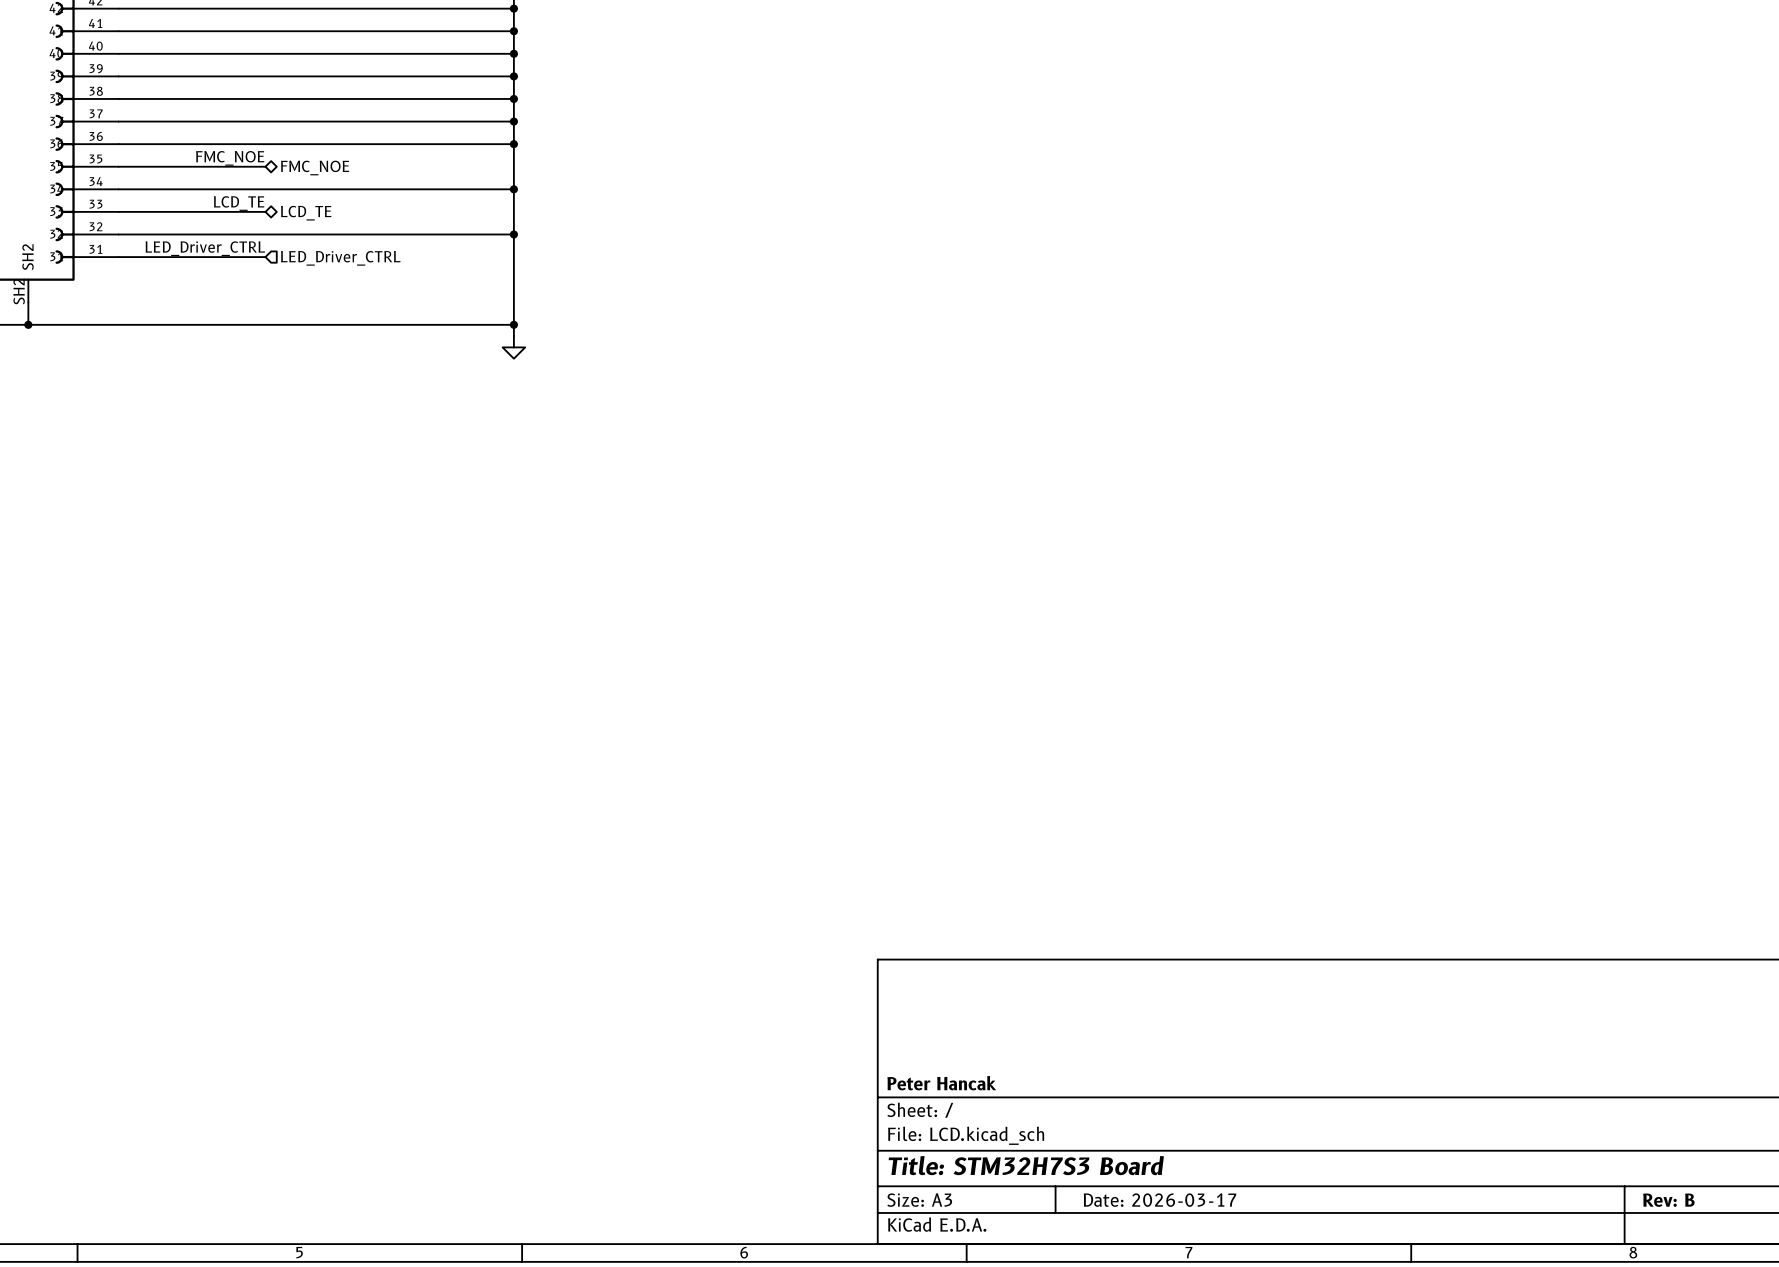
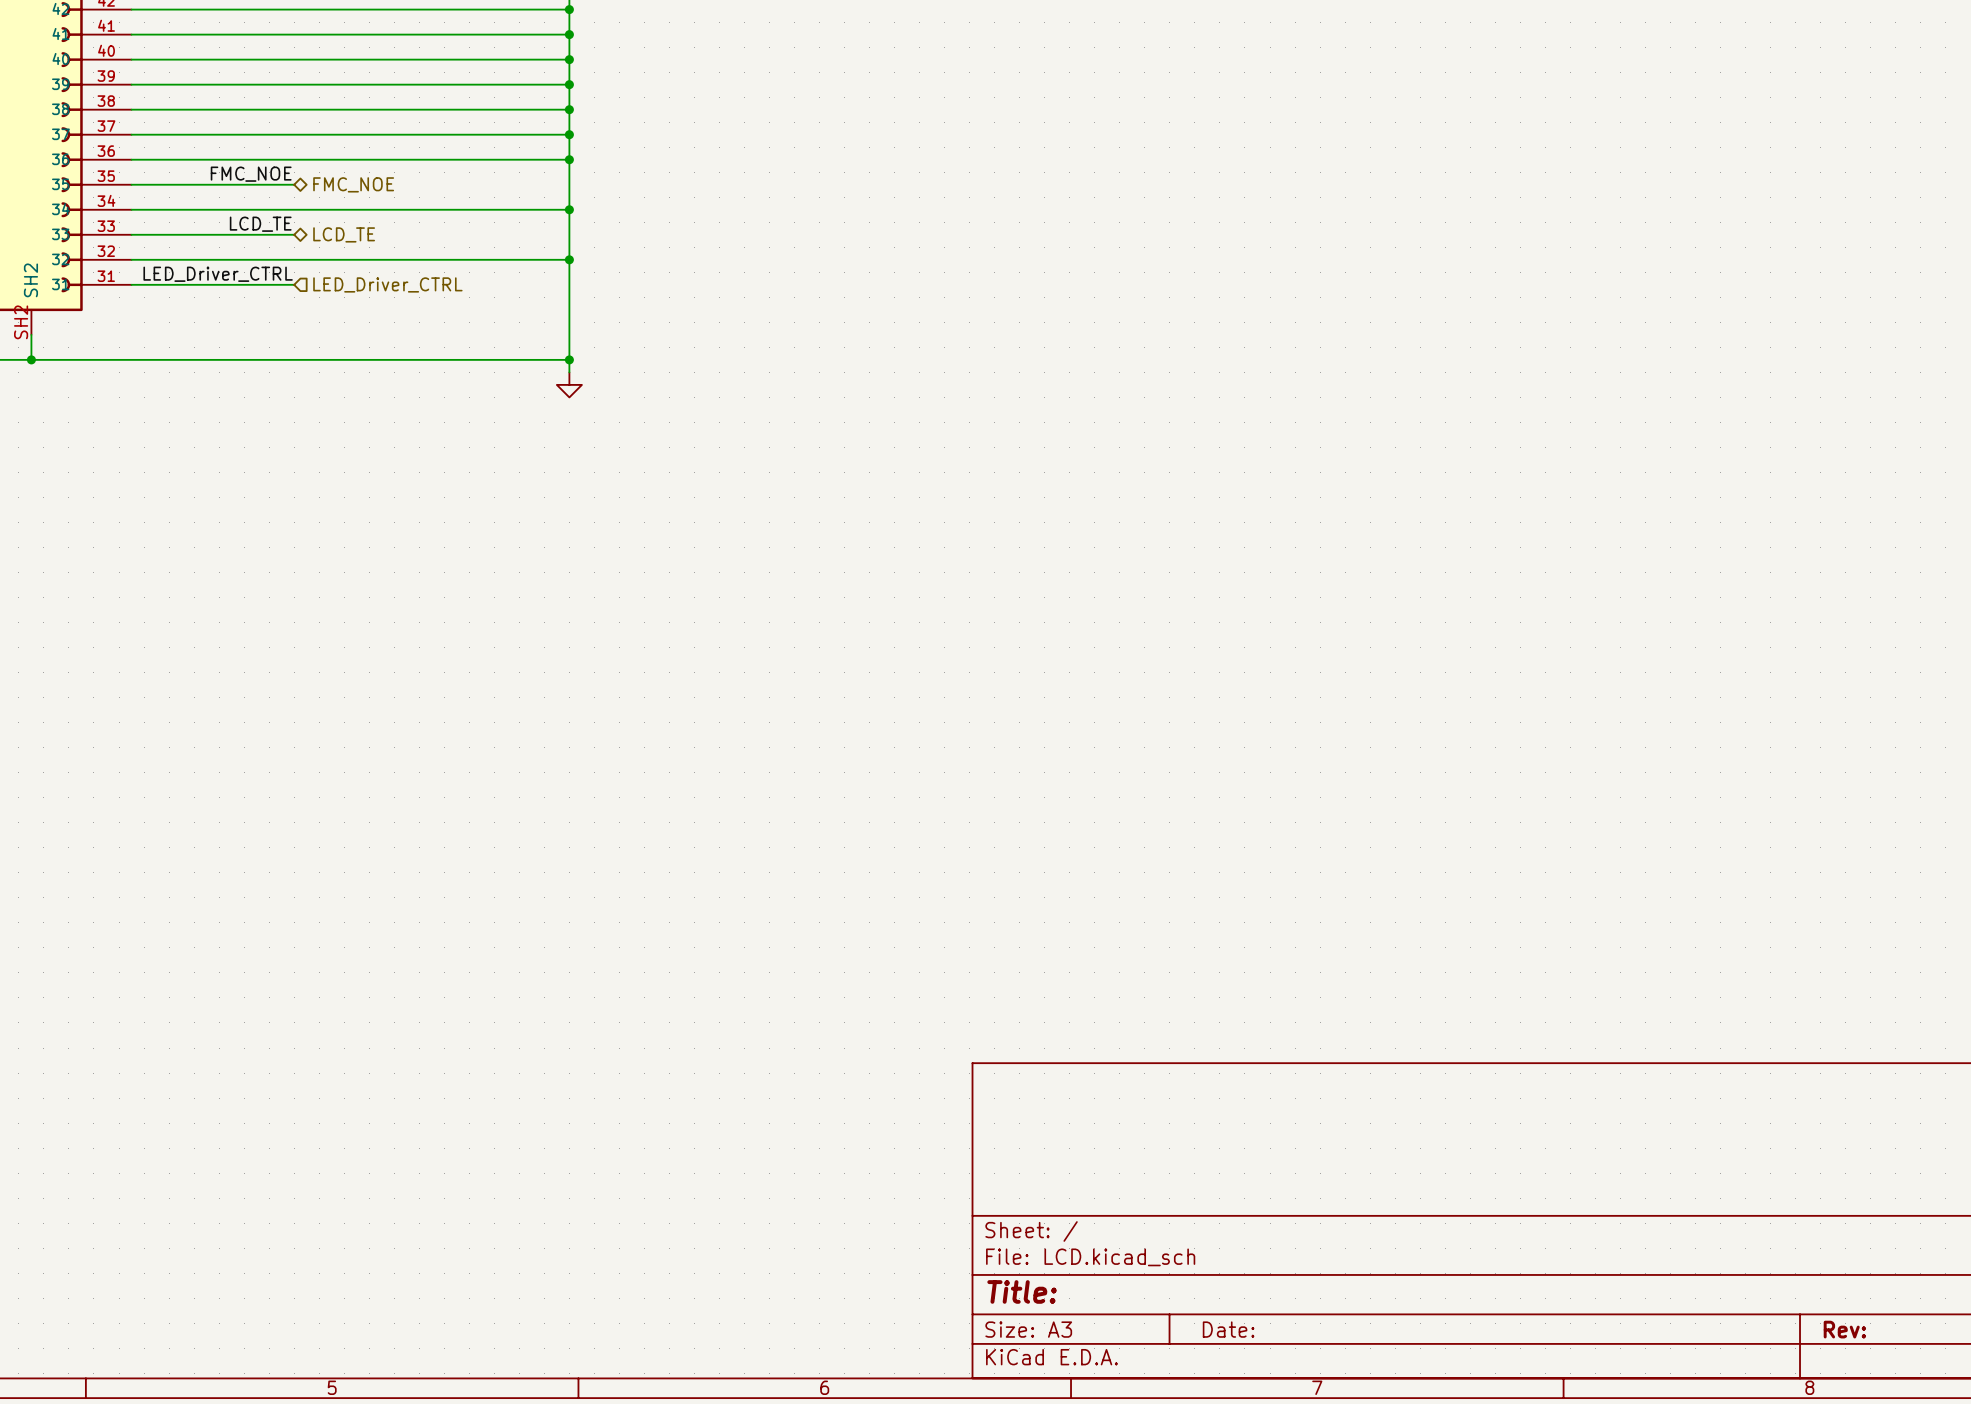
title block: Peter Hancak (941, 1083) -> none
title block: Title: STM32H7S3 Board (1026, 1165) -> Title: (1022, 1291)
title block: Date: 2026-03-17 (1159, 1200) -> Date: (1228, 1329)
title block: Rev: B (1668, 1200) -> Rev: (1844, 1329)

